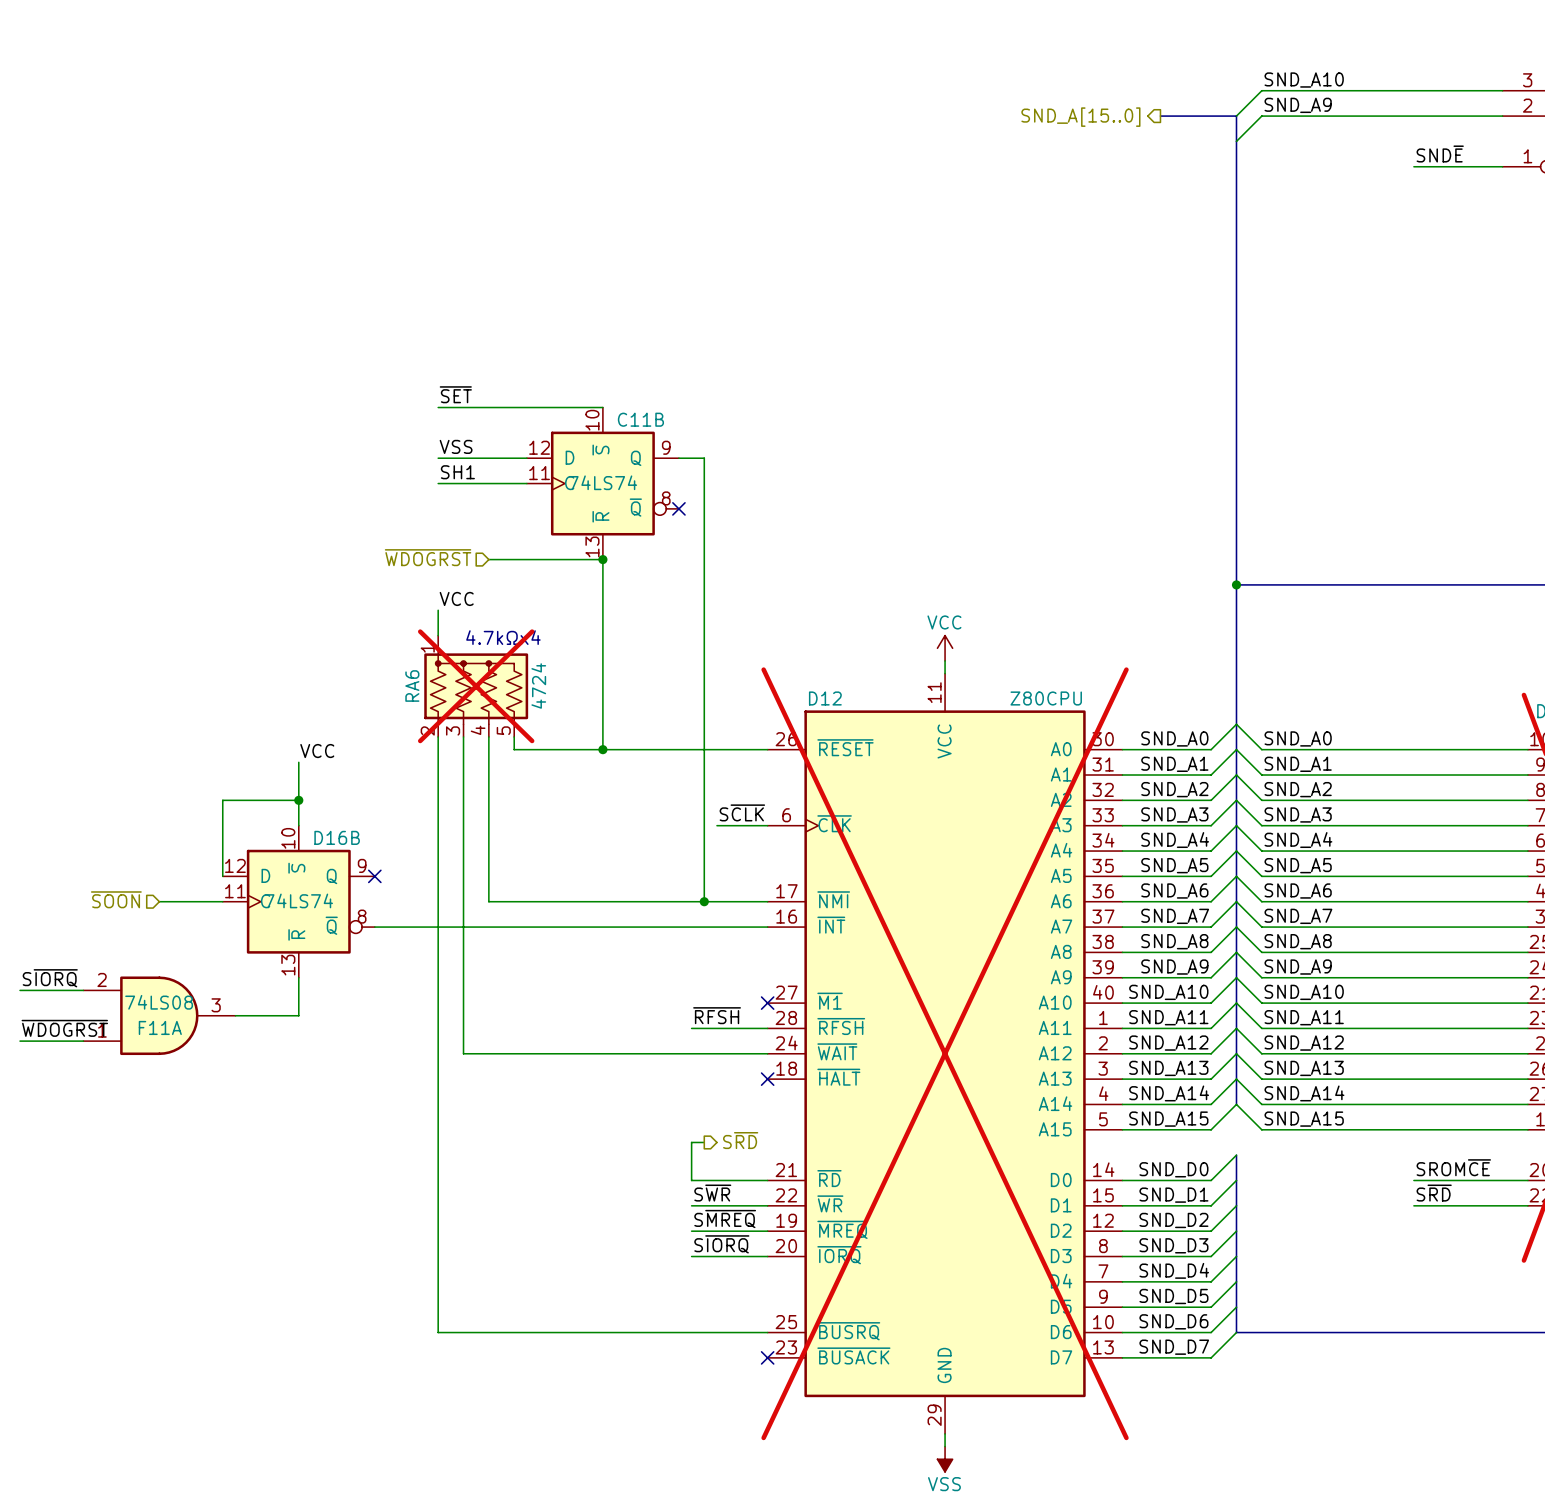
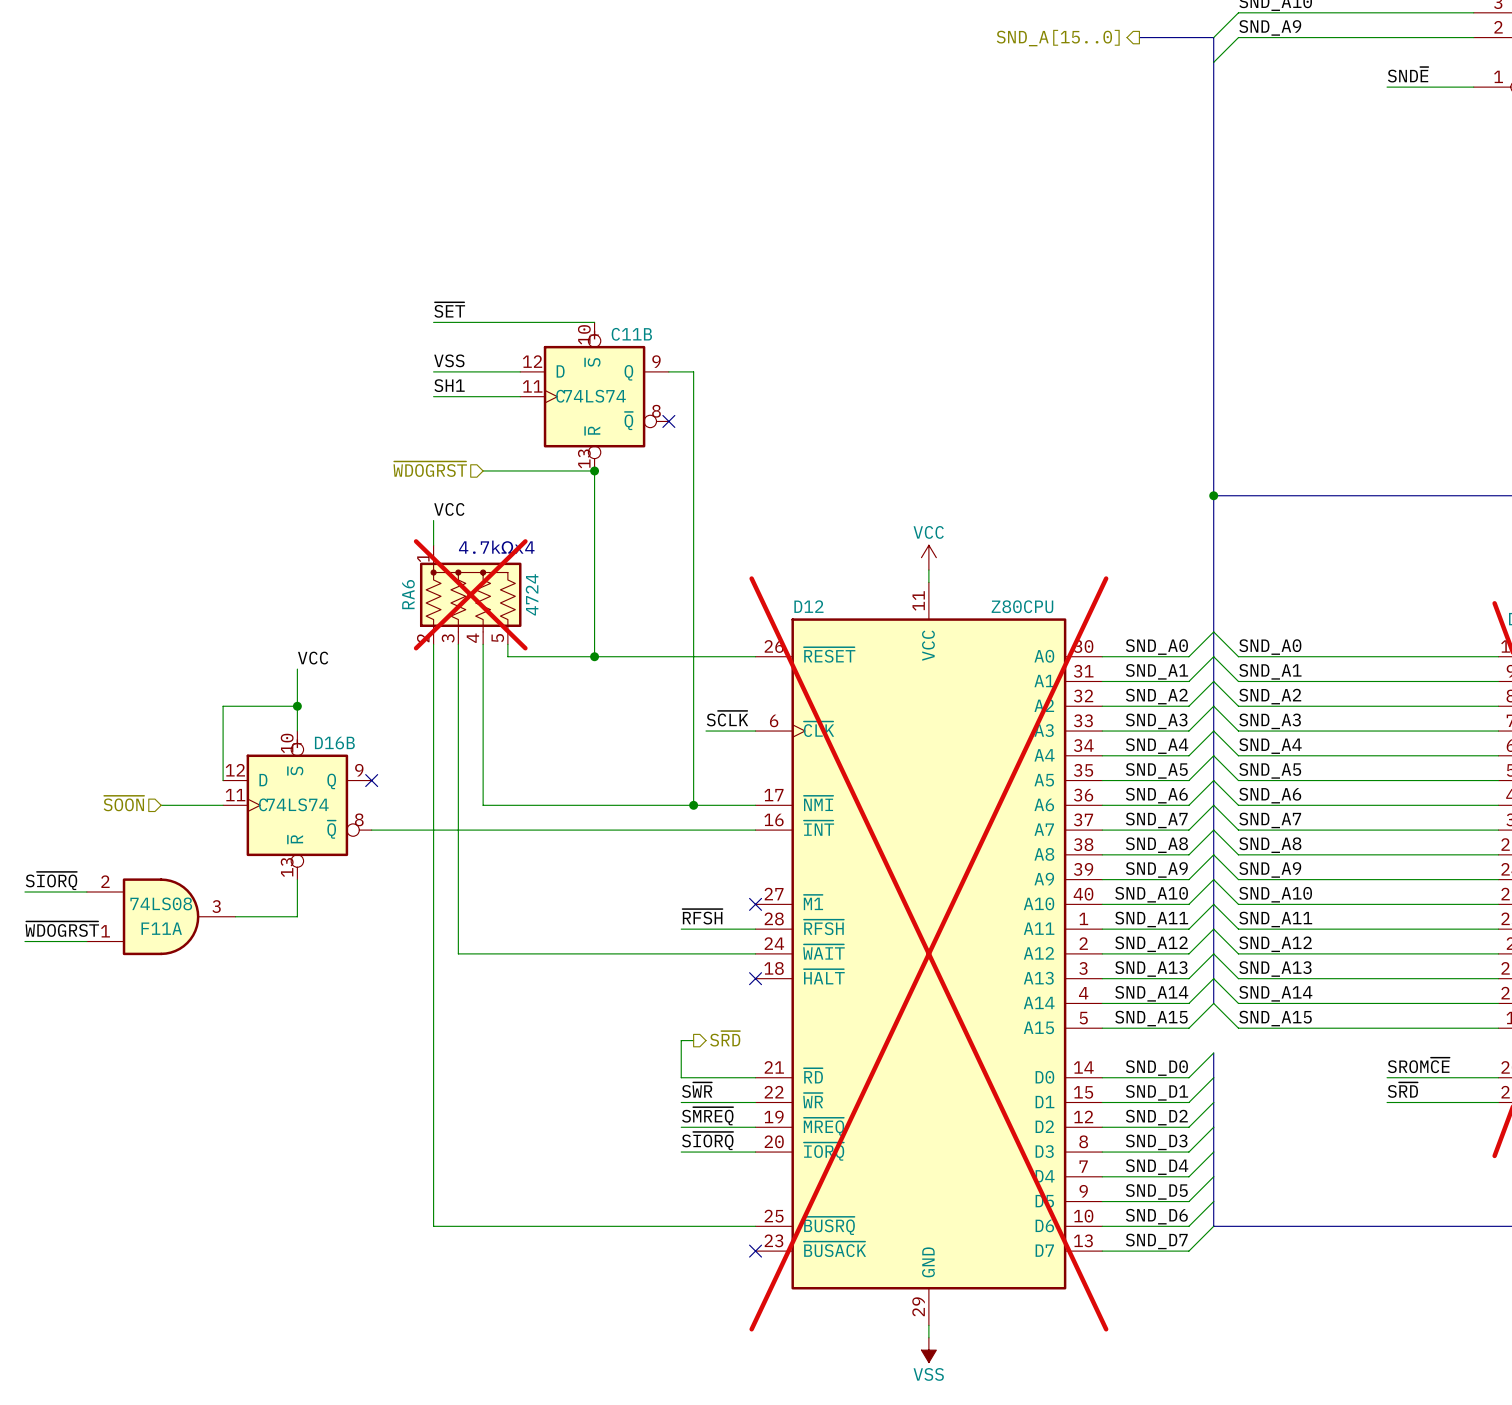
C11B symbol: [526, 407, 679, 560] -> [520, 322, 669, 471]
D16B symbol: [222, 825, 375, 978] -> [223, 731, 372, 880]

